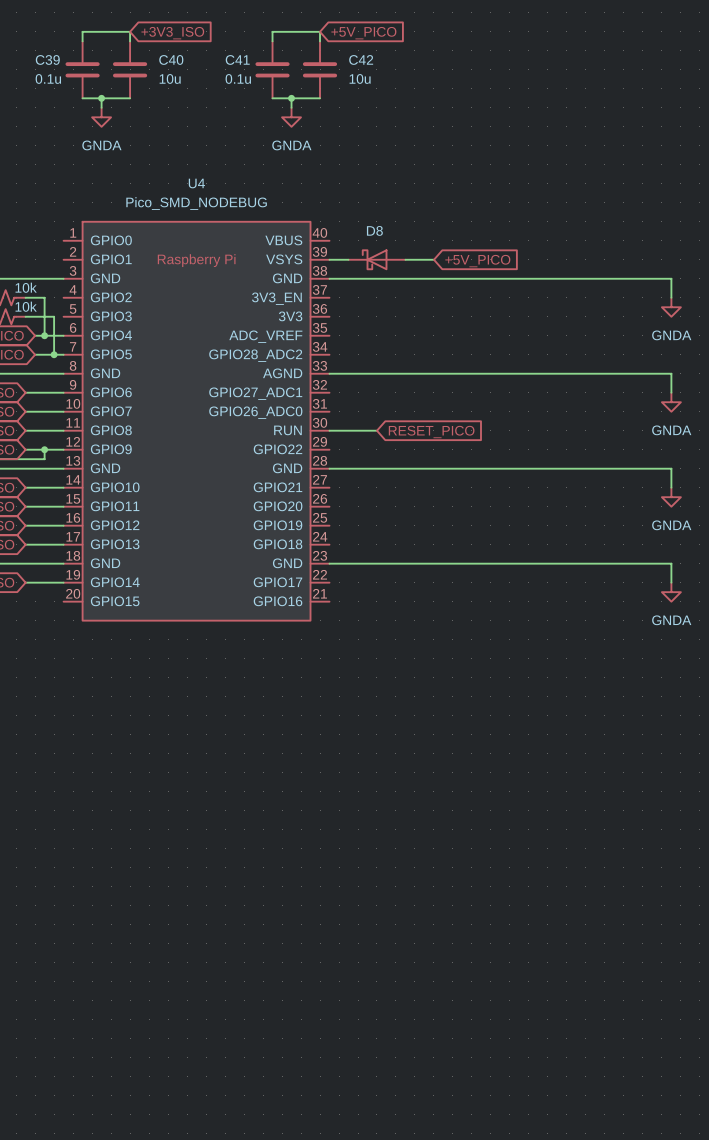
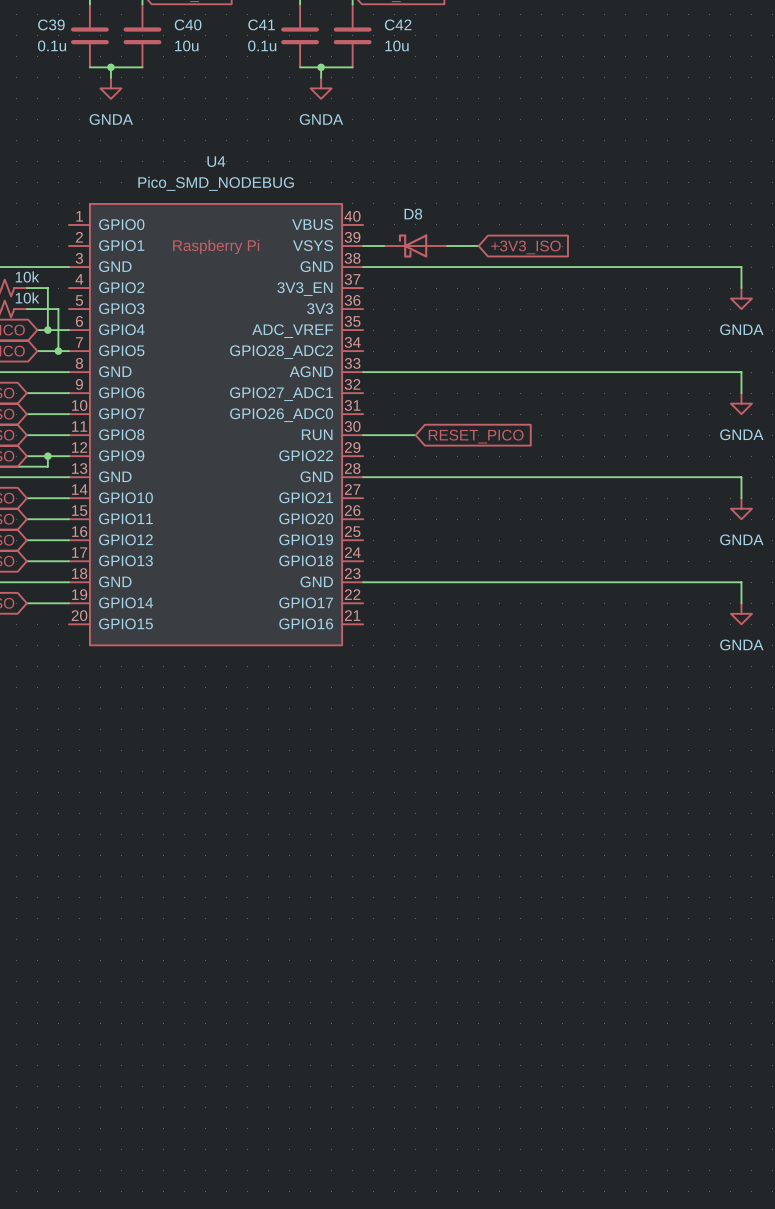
global label: +5V_PICO (477, 261) -> +3V3_ISO (526, 247)

